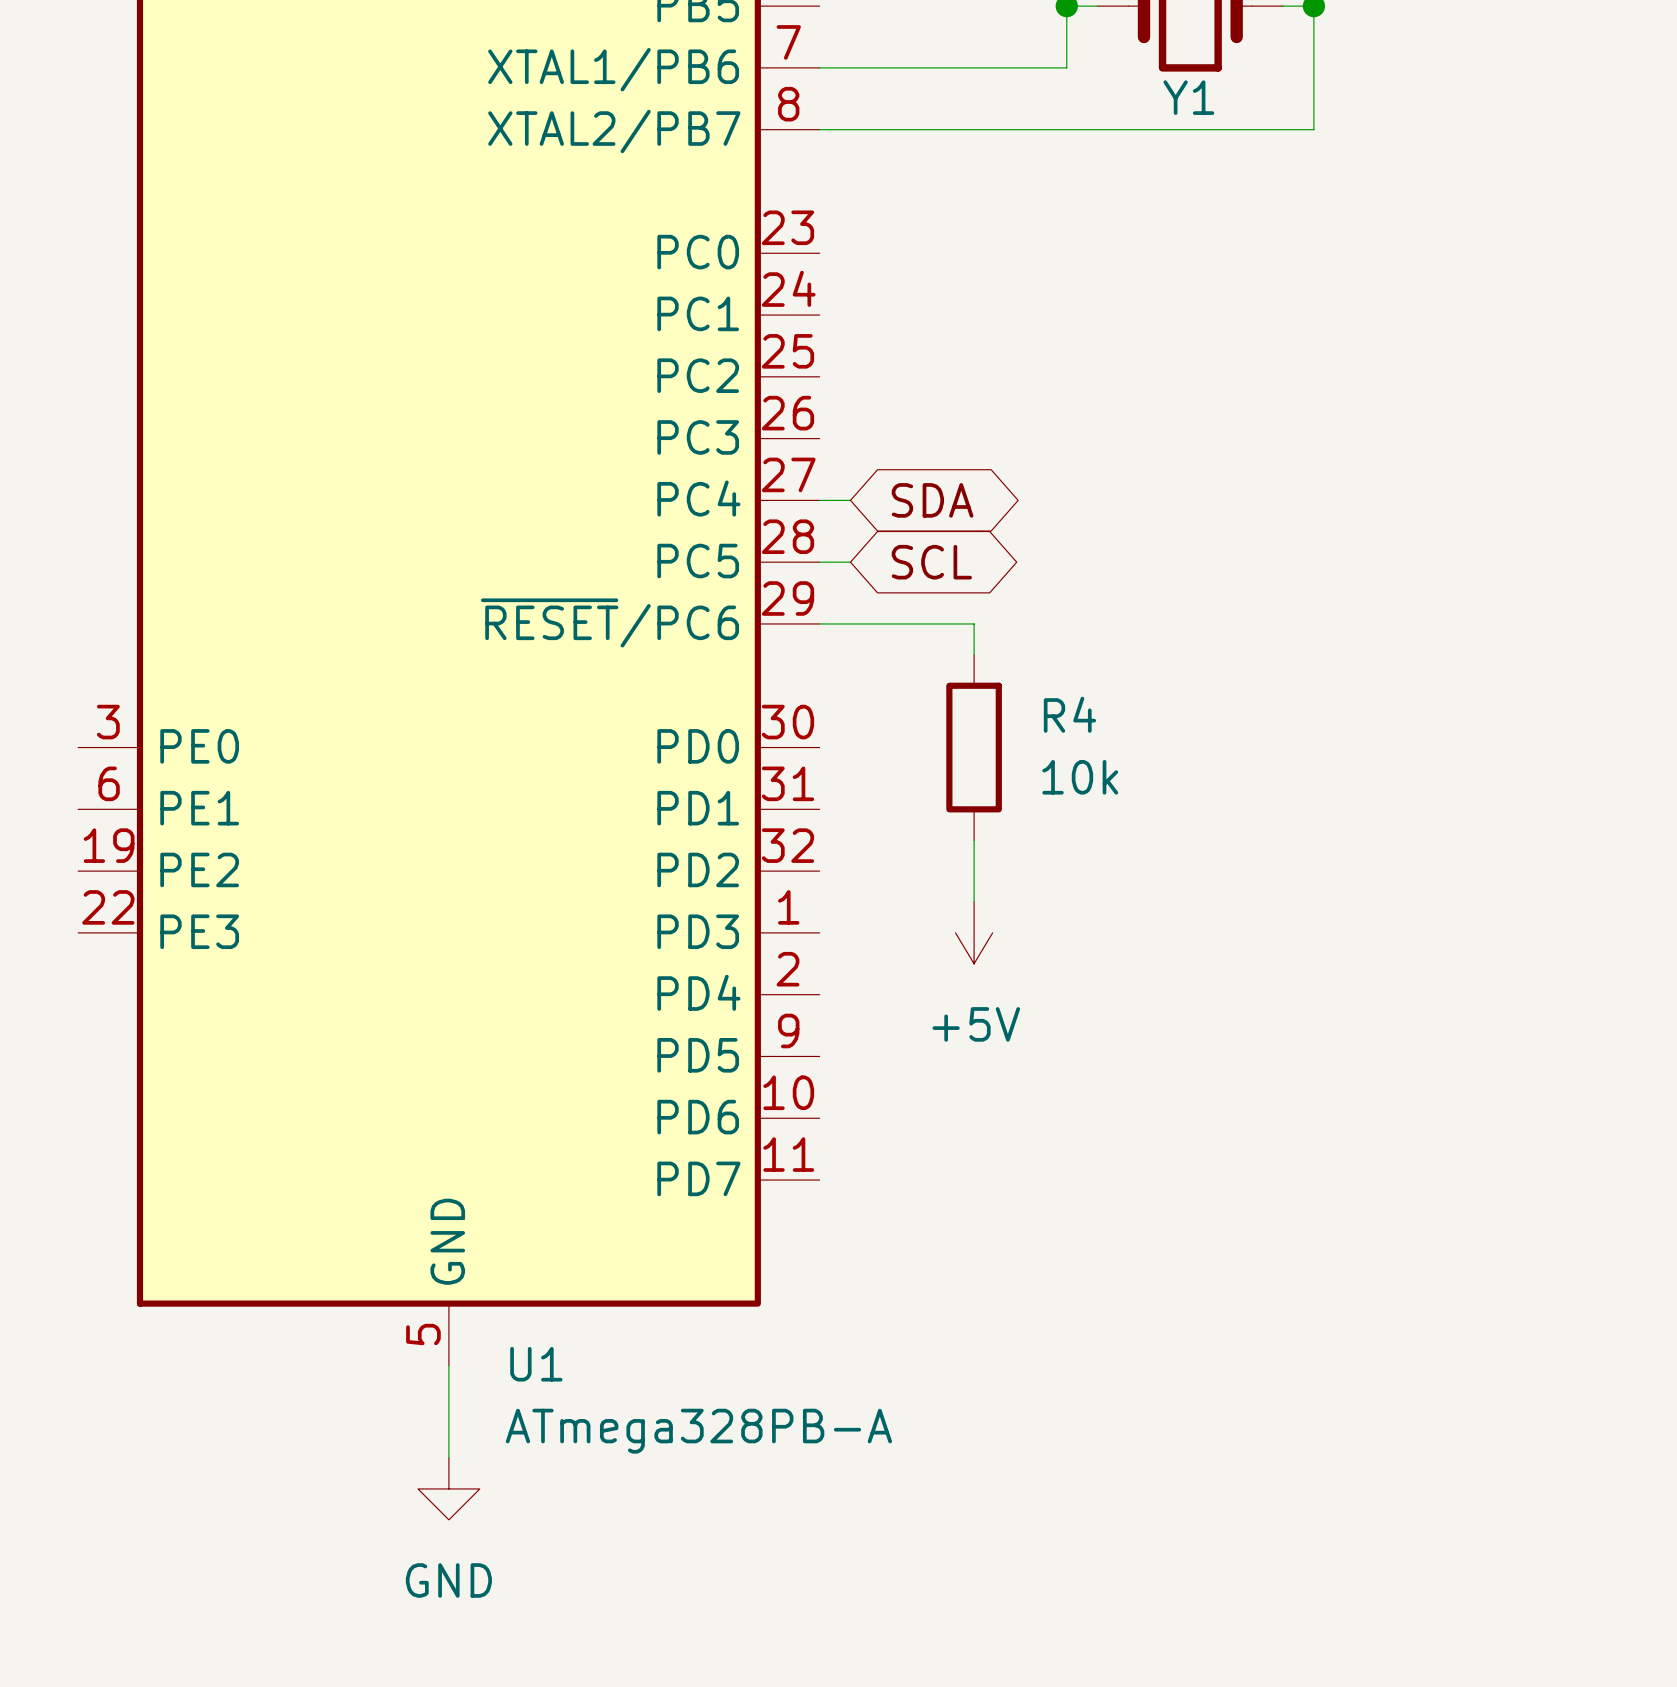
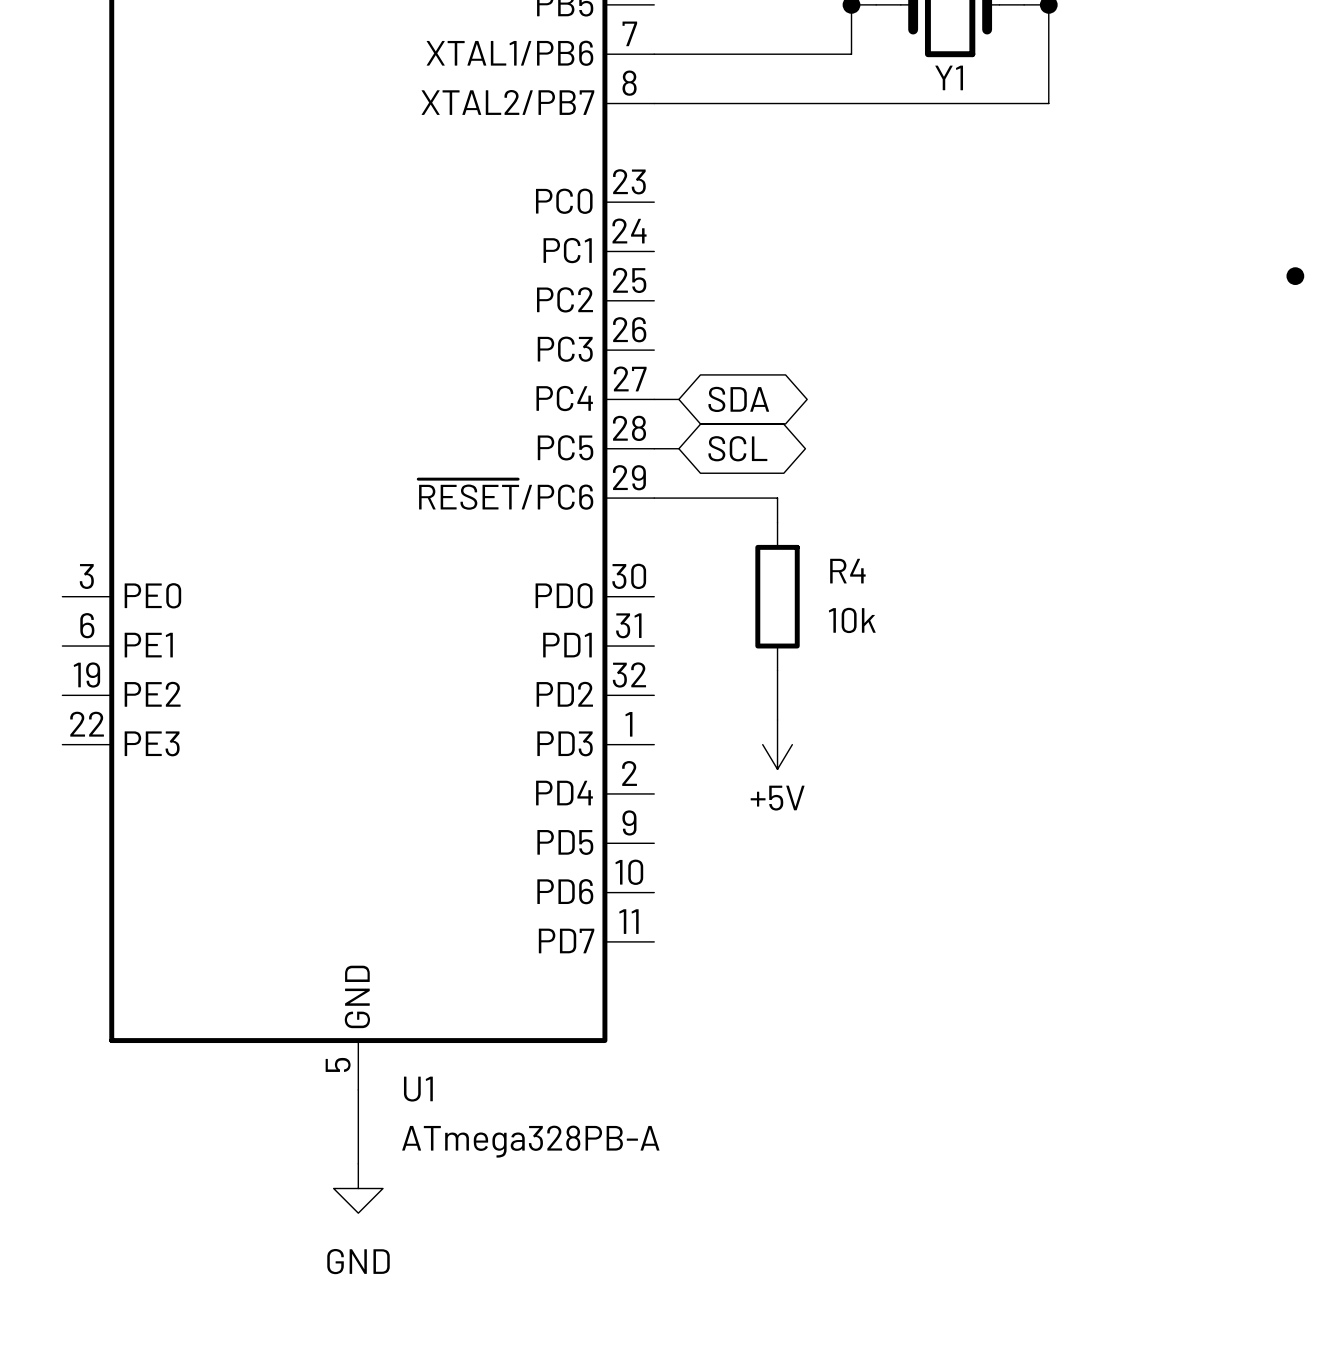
junction: none -> (1295, 276)
power symbol text position: +5V (976, 1024) -> +5V (777, 798)

